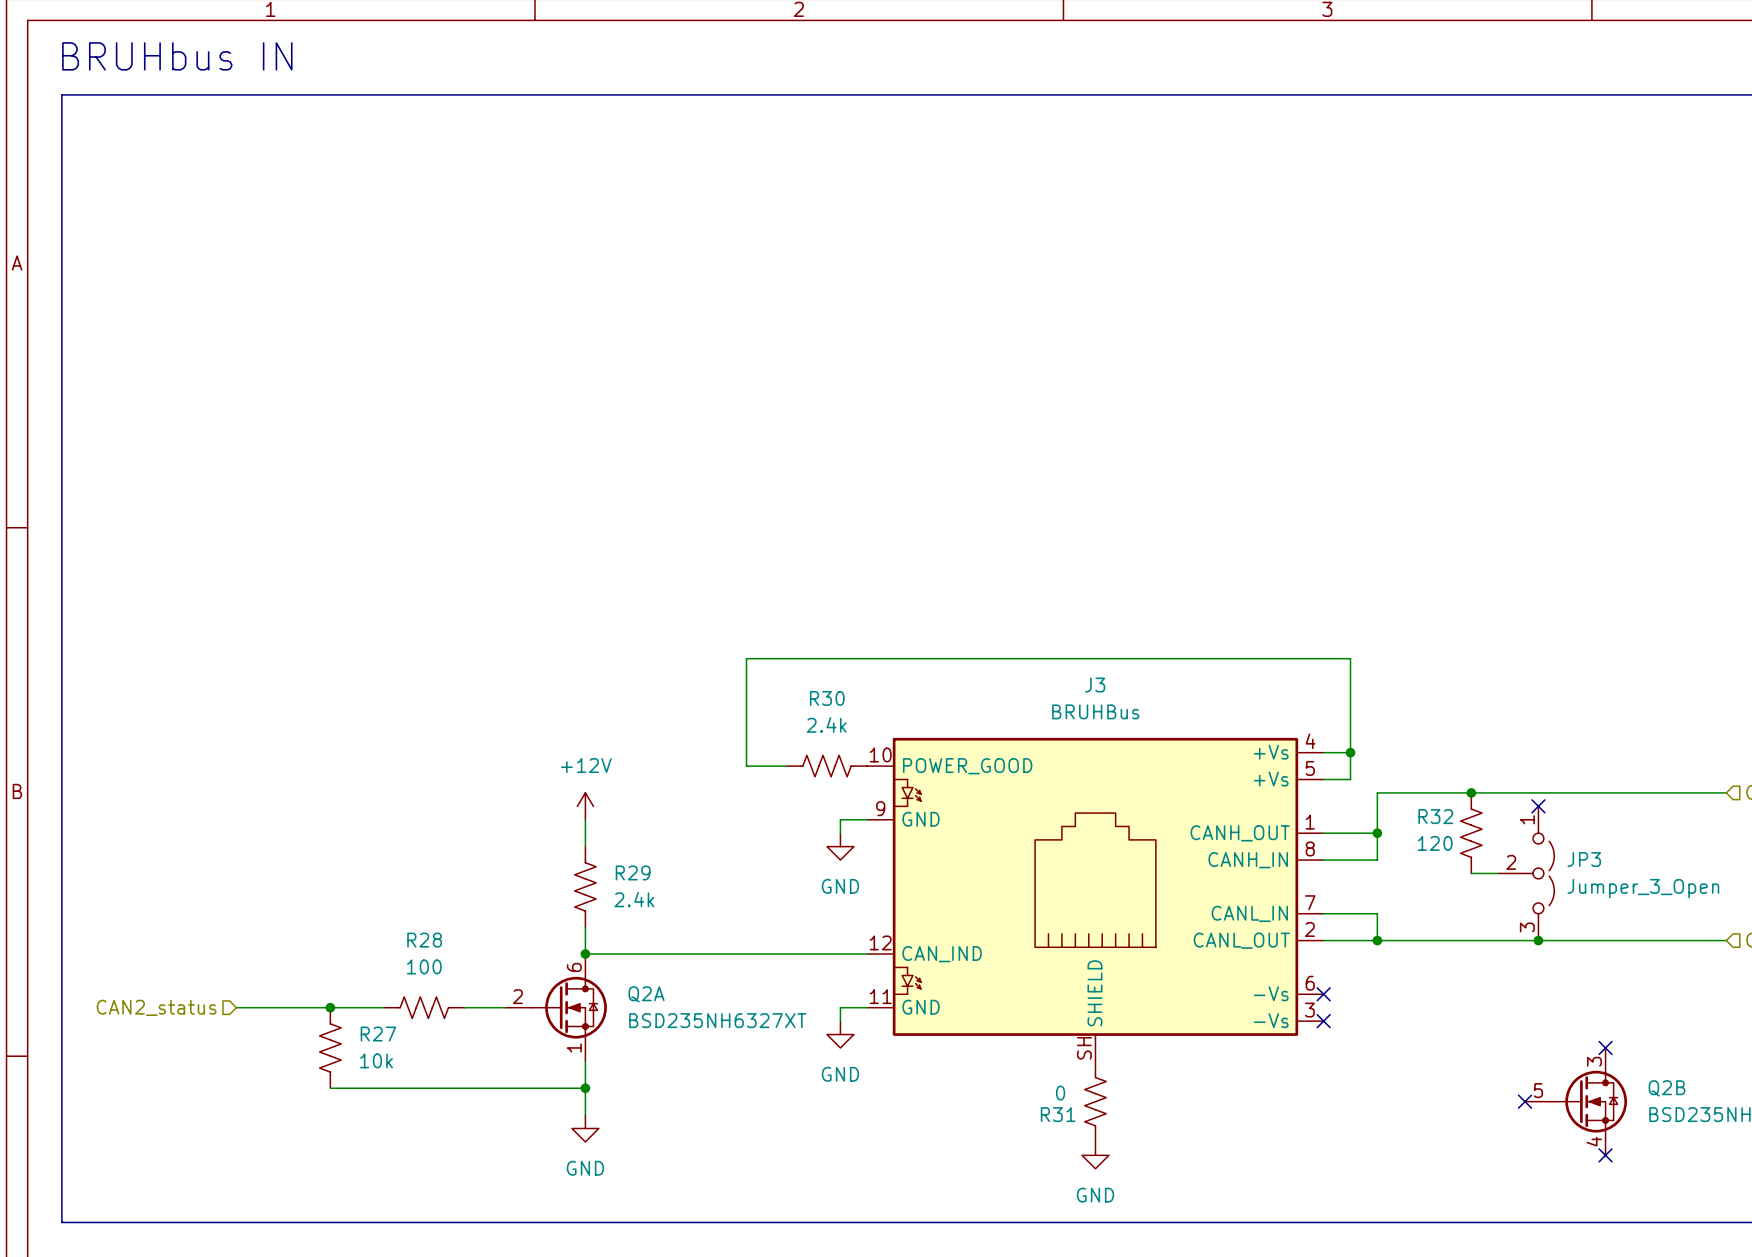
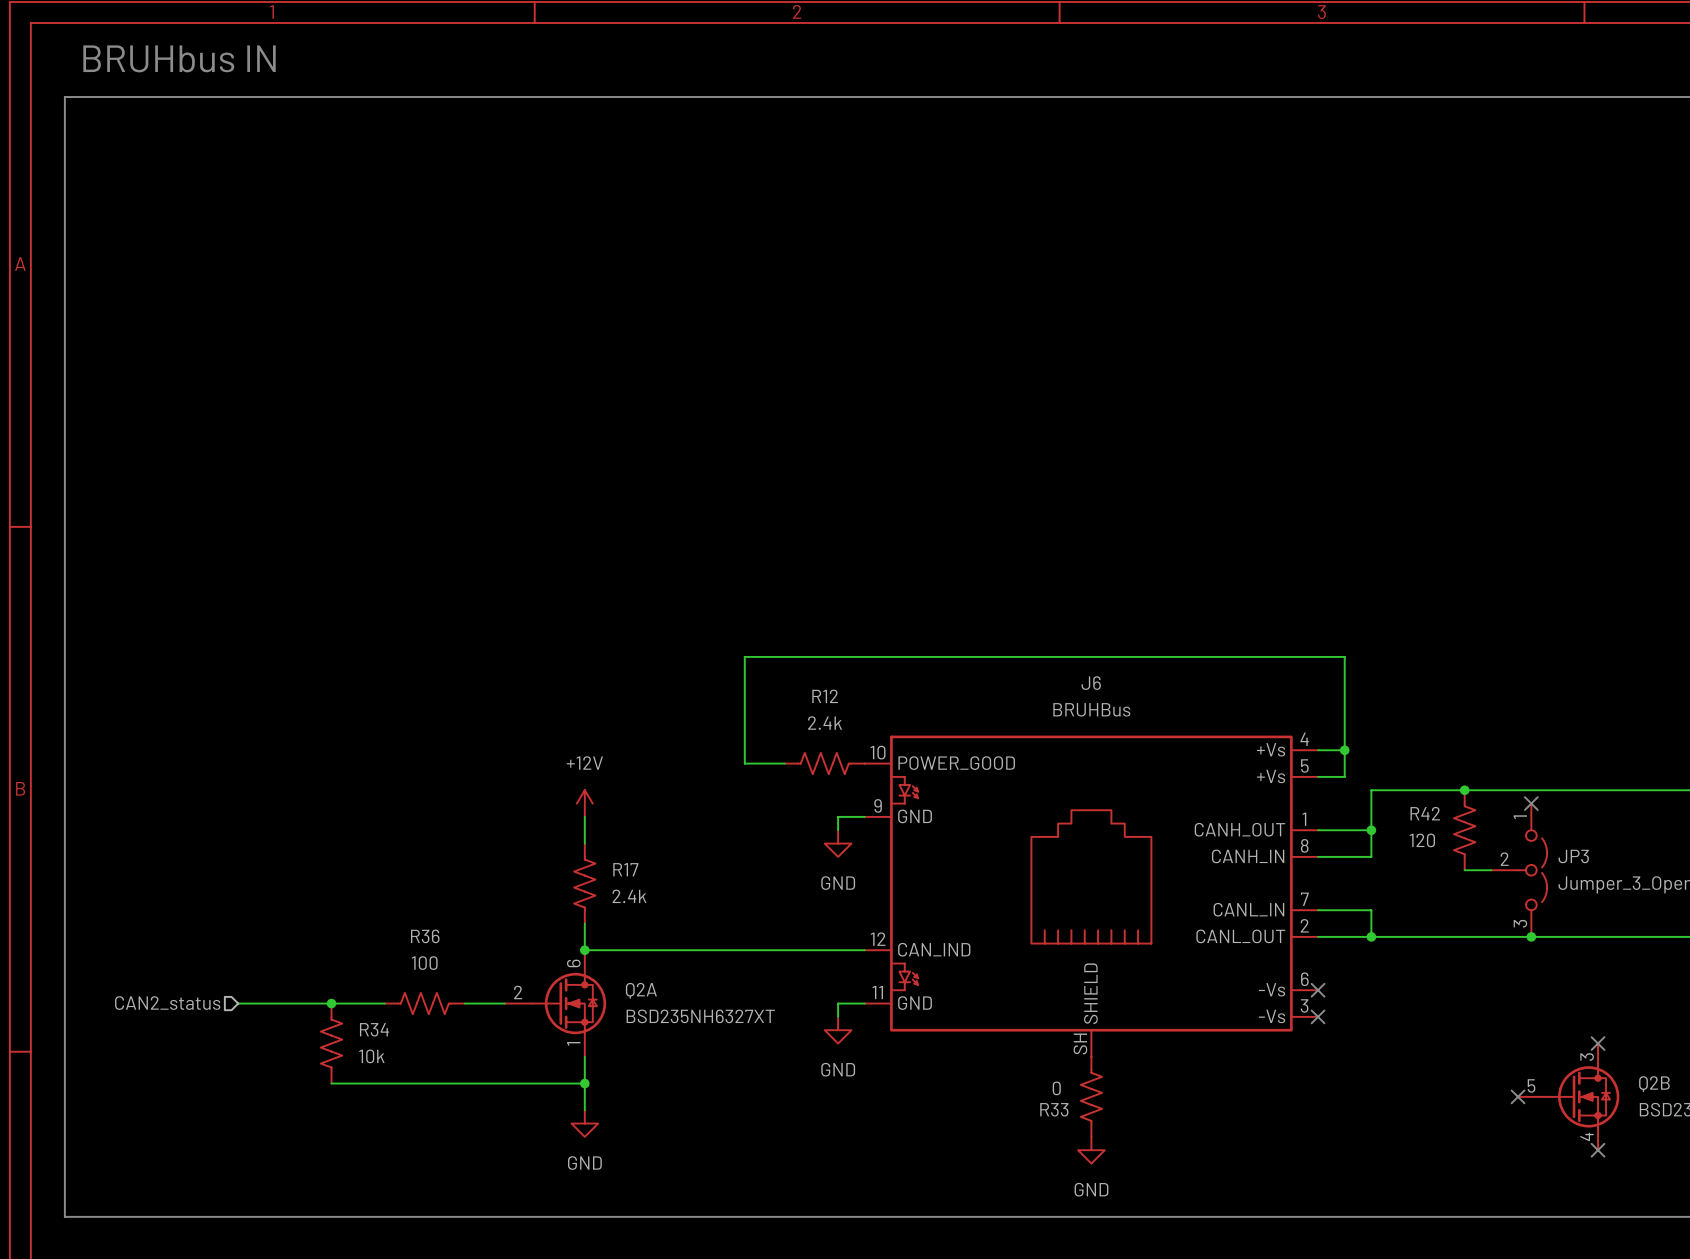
J3 name: J3 (1095, 685) -> J6 (1091, 683)
R30 name: R30 (827, 698) -> R12 (825, 696)
R32 name: R32 (1435, 816) -> R42 (1425, 813)
R29 name: R29 (633, 872) -> R17 (625, 869)
R28 name: R28 (424, 940) -> R36 (425, 936)
R27 name: R27 (378, 1034) -> R34 (374, 1029)
R31 name: R31 (1058, 1114) -> R33 (1054, 1109)

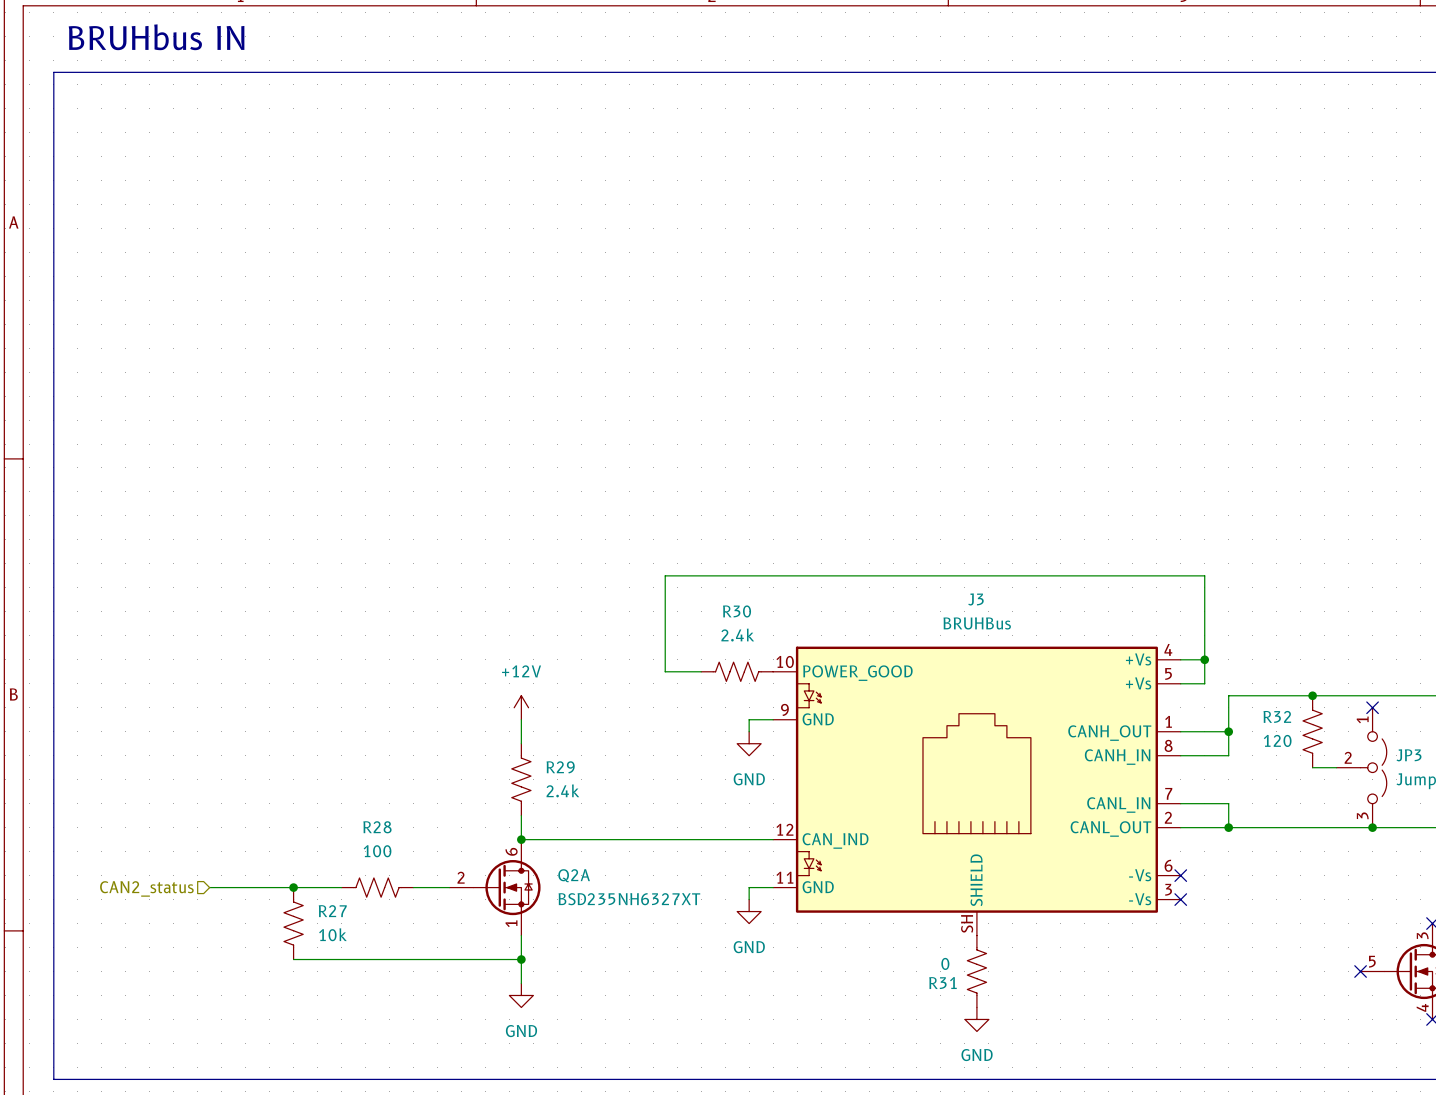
J6 name: J6 (1091, 683) -> J3 (975, 599)
R12 name: R12 (825, 696) -> R30 (737, 611)
R42 name: R42 (1425, 813) -> R32 (1277, 716)
R17 name: R17 (625, 869) -> R29 (560, 767)
R36 name: R36 (425, 936) -> R28 (377, 827)
R34 name: R34 (374, 1029) -> R27 (332, 911)
R33 name: R33 (1054, 1109) -> R31 (942, 983)

